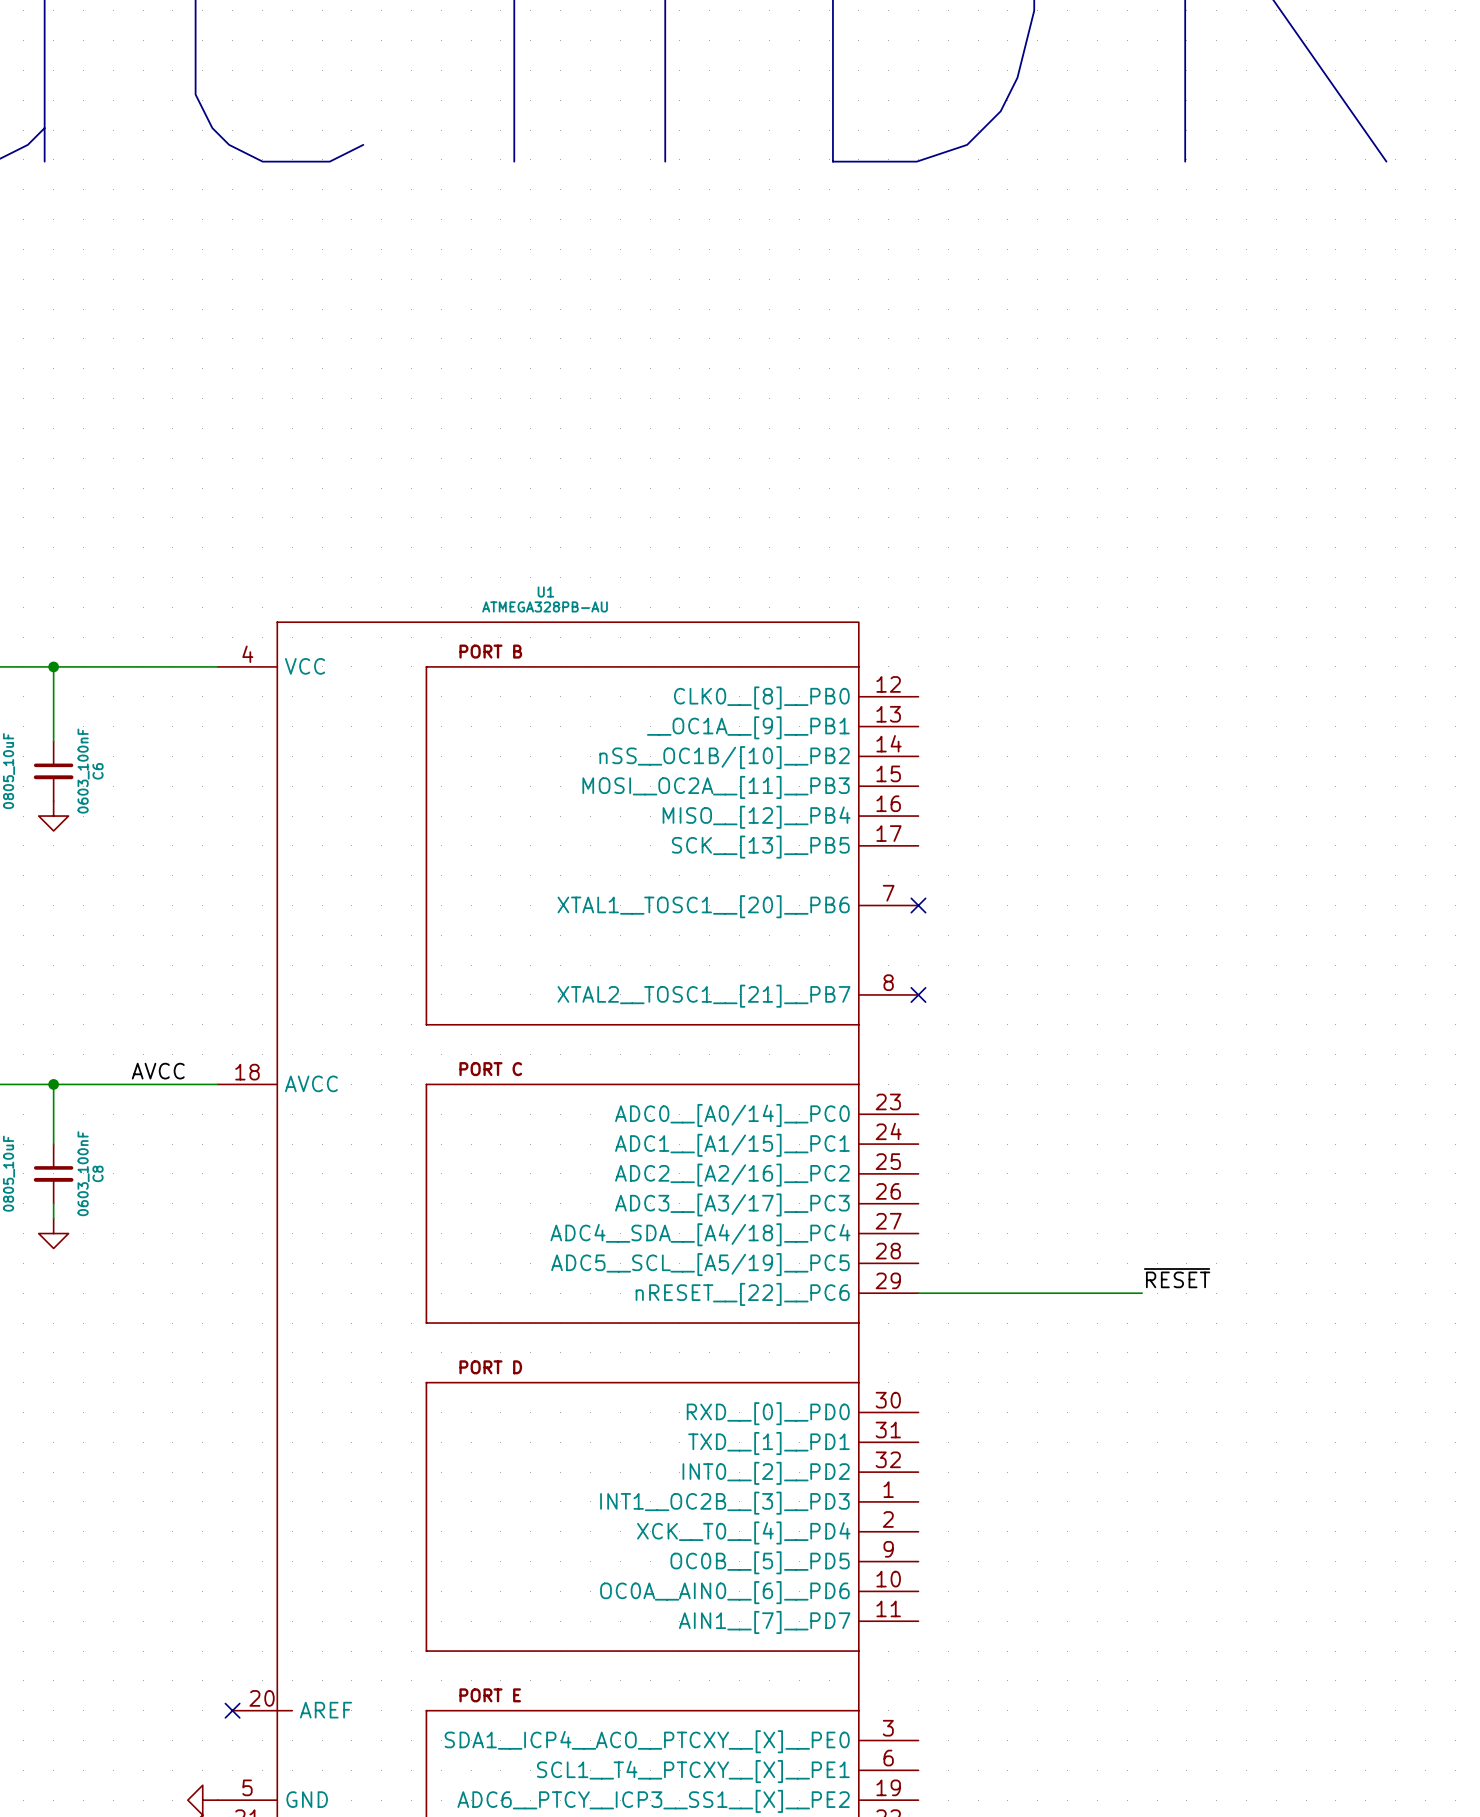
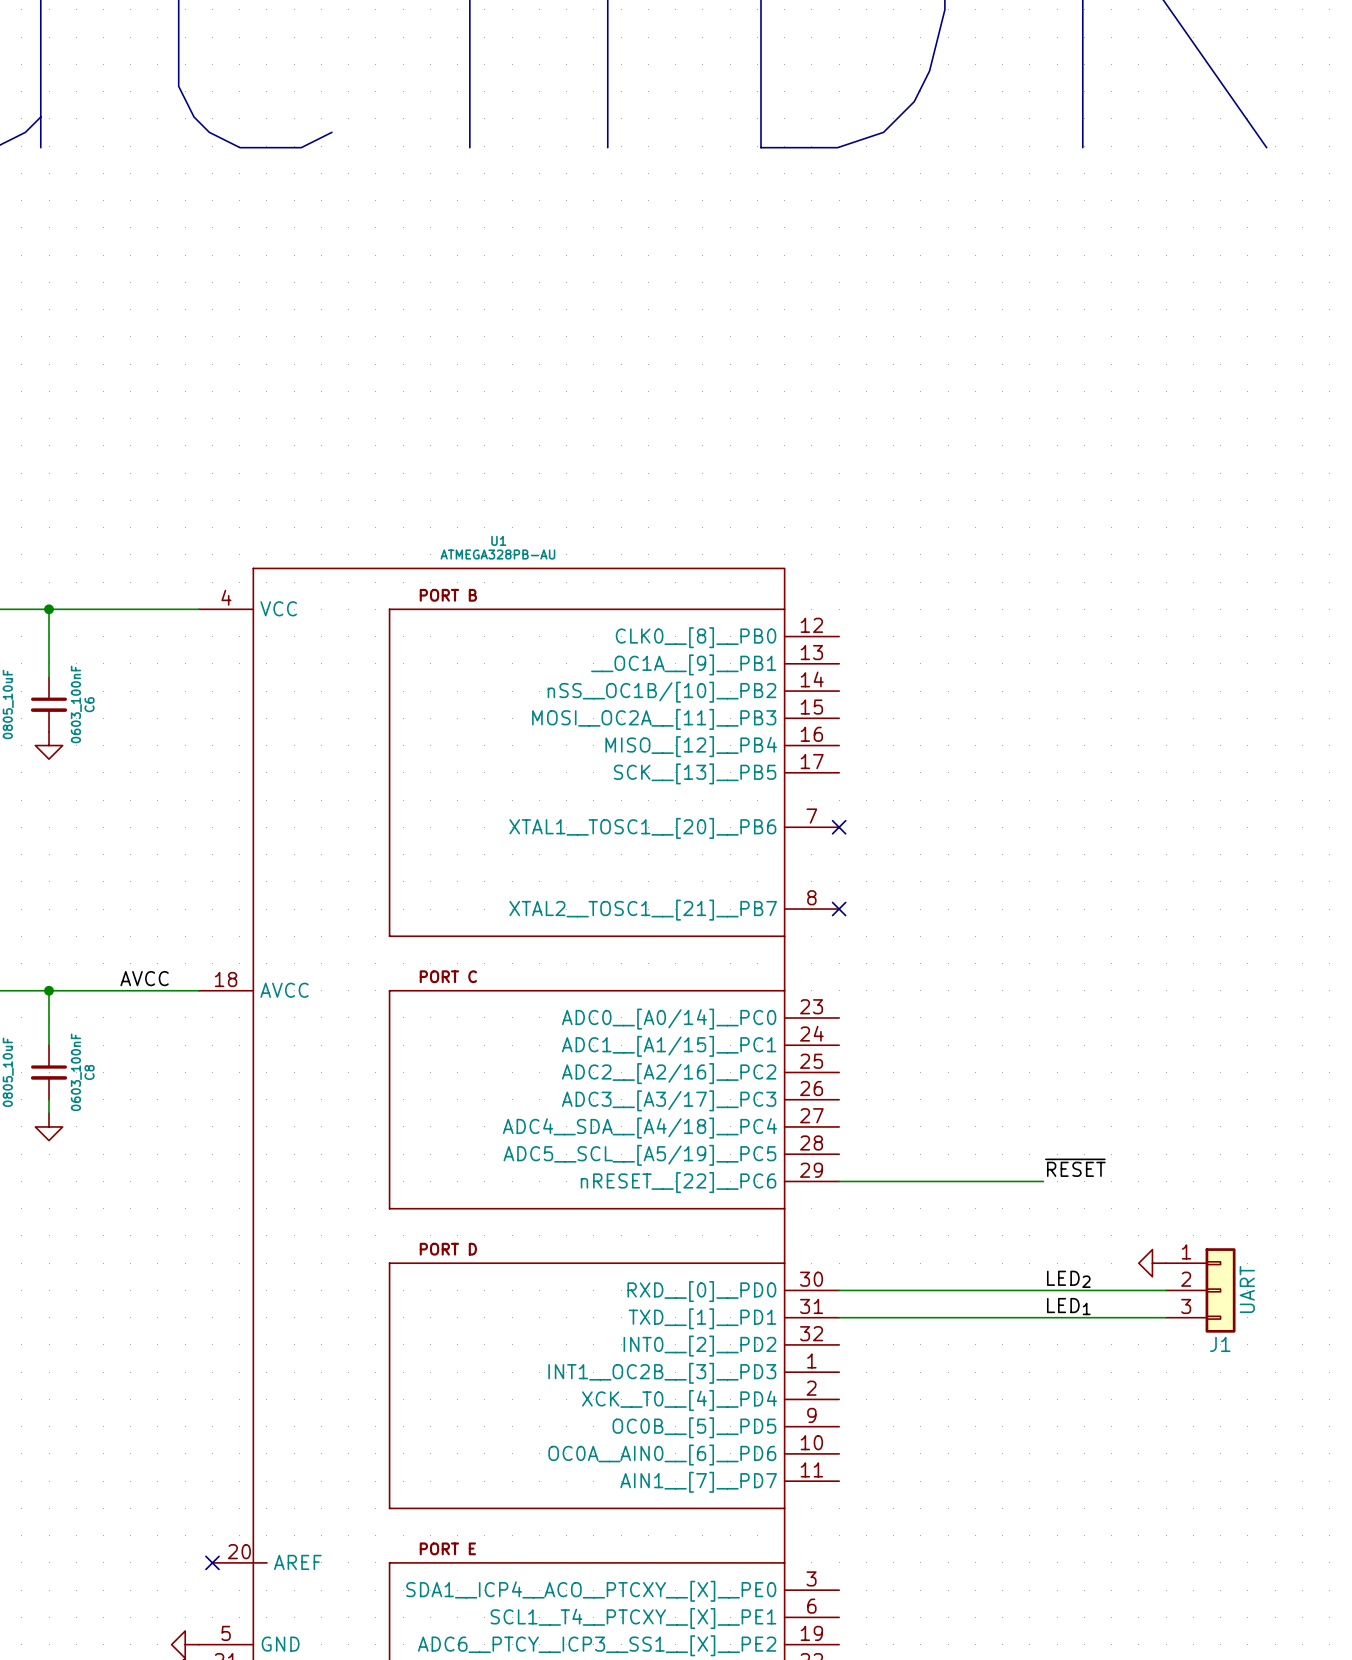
power symbol: none -> (1152, 1263)
label: none -> LED2 (1068, 1279)
wire: none -> (839, 1290) (1166, 1290)
J1: none -> UART (1200, 1290)
label: none -> LED1 (1068, 1306)
wire: none -> (839, 1317) (1166, 1317)

